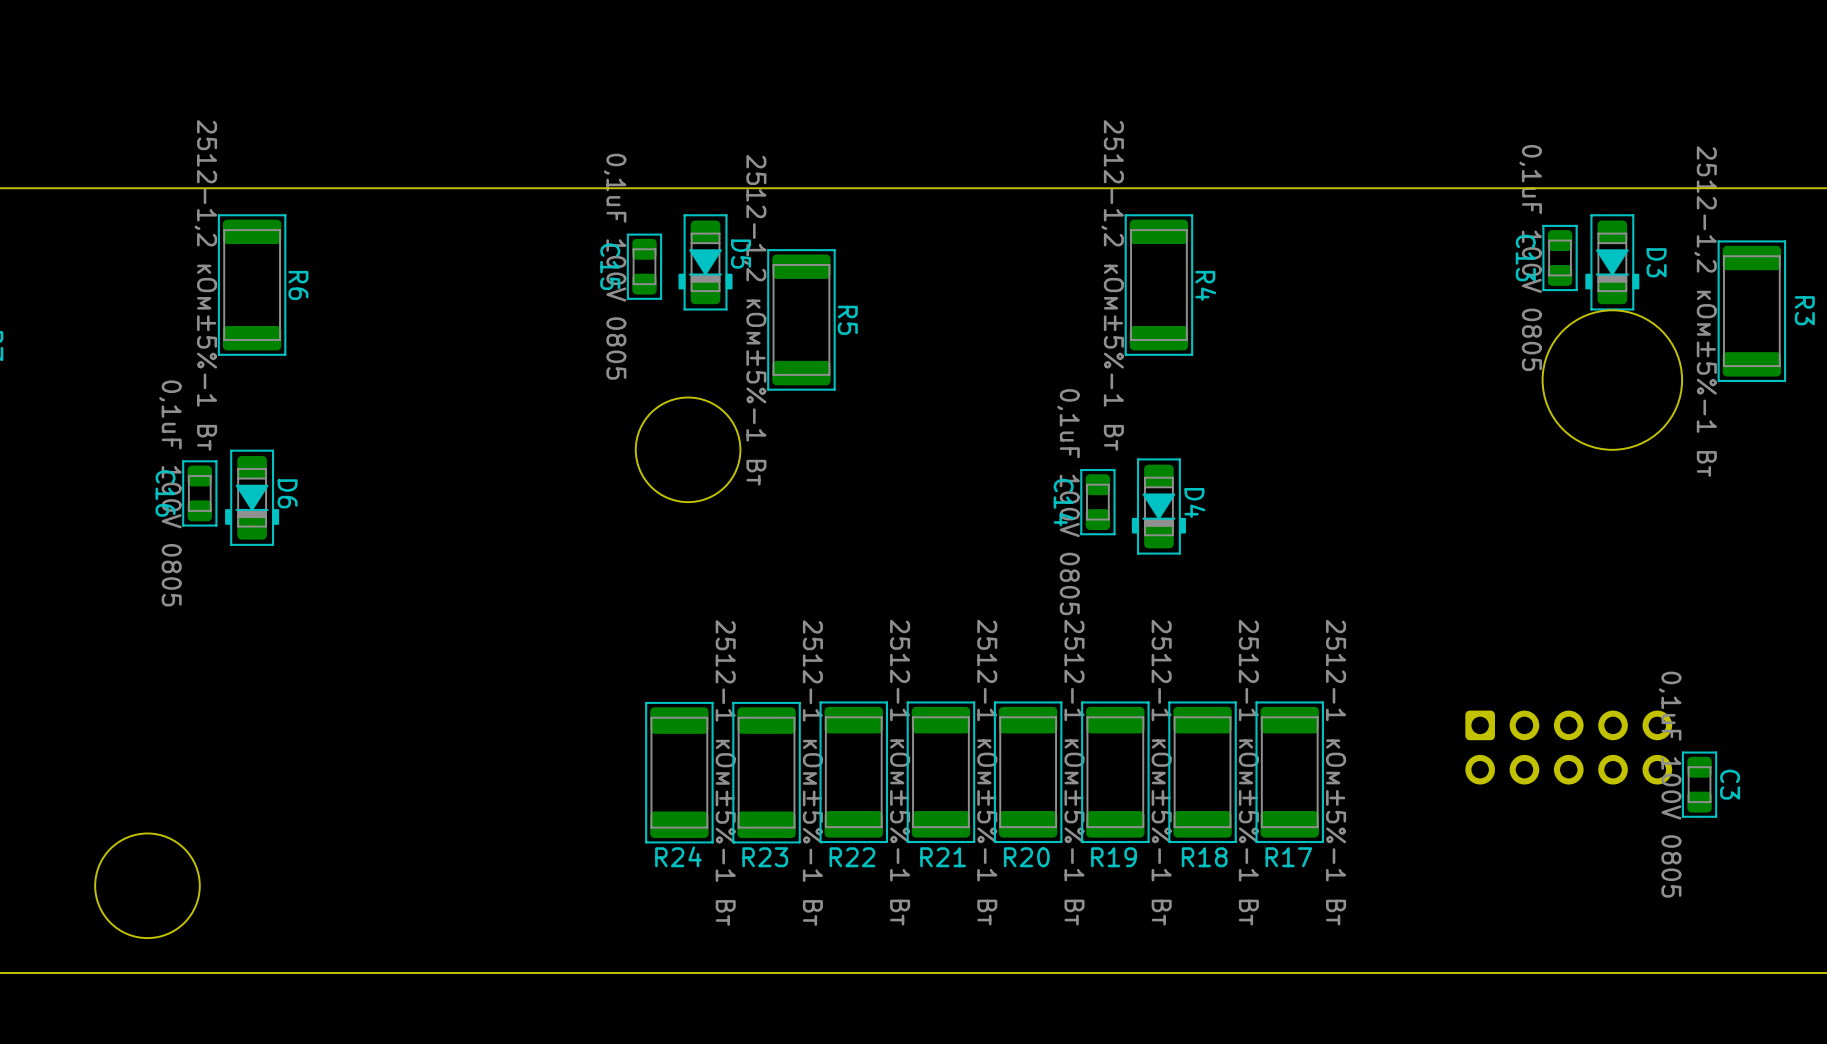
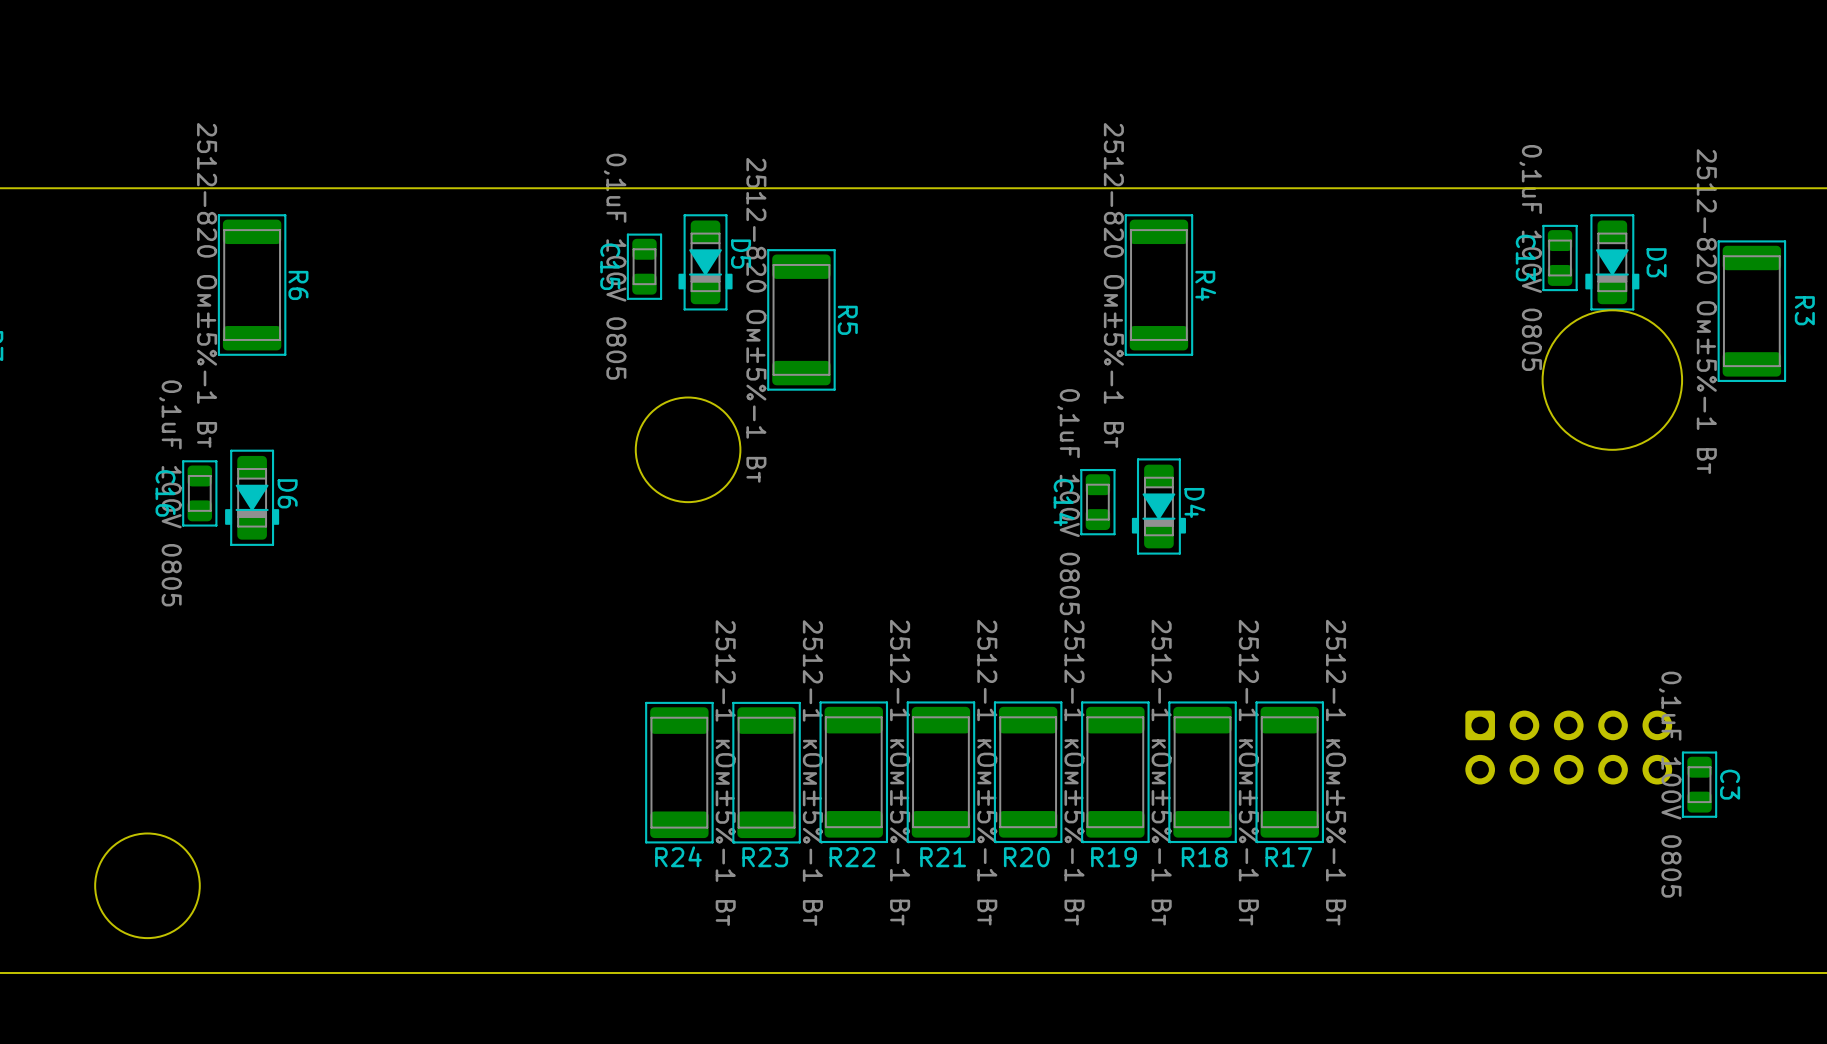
R6 value: 2512-1,2 кОм±5%-1 Вт (205, 285) -> 2512-820 Ом±5%-1 Вт (207, 285)
R4 value: 2512-1,2 кОм±5%-1 Вт (1112, 285) -> 2512-820 Ом±5%-1 Вт (1113, 285)
R3 value: 2512-1,2 кОм±5%-1 Вт (1705, 311) -> 2512-820 Ом±5%-1 Вт (1706, 311)
R5 value: 2512-1,2 кОм±5%-1 Вт (755, 320) -> 2512-820 Ом±5%-1 Вт (756, 320)

